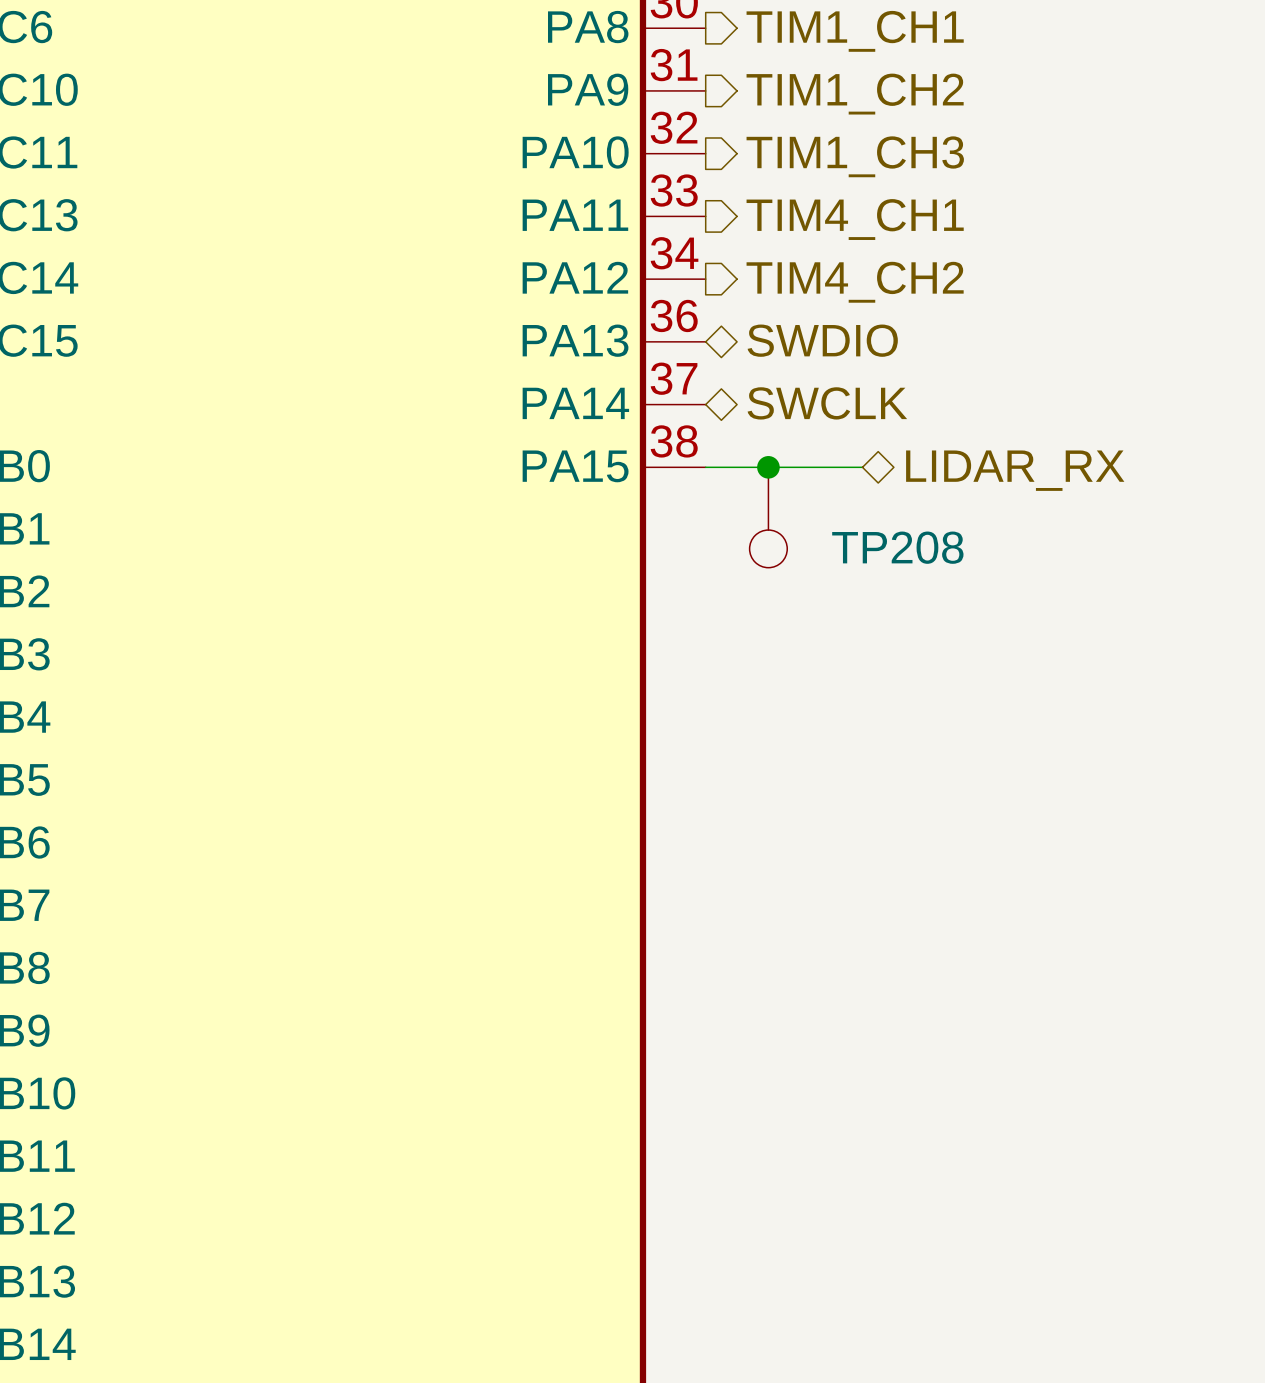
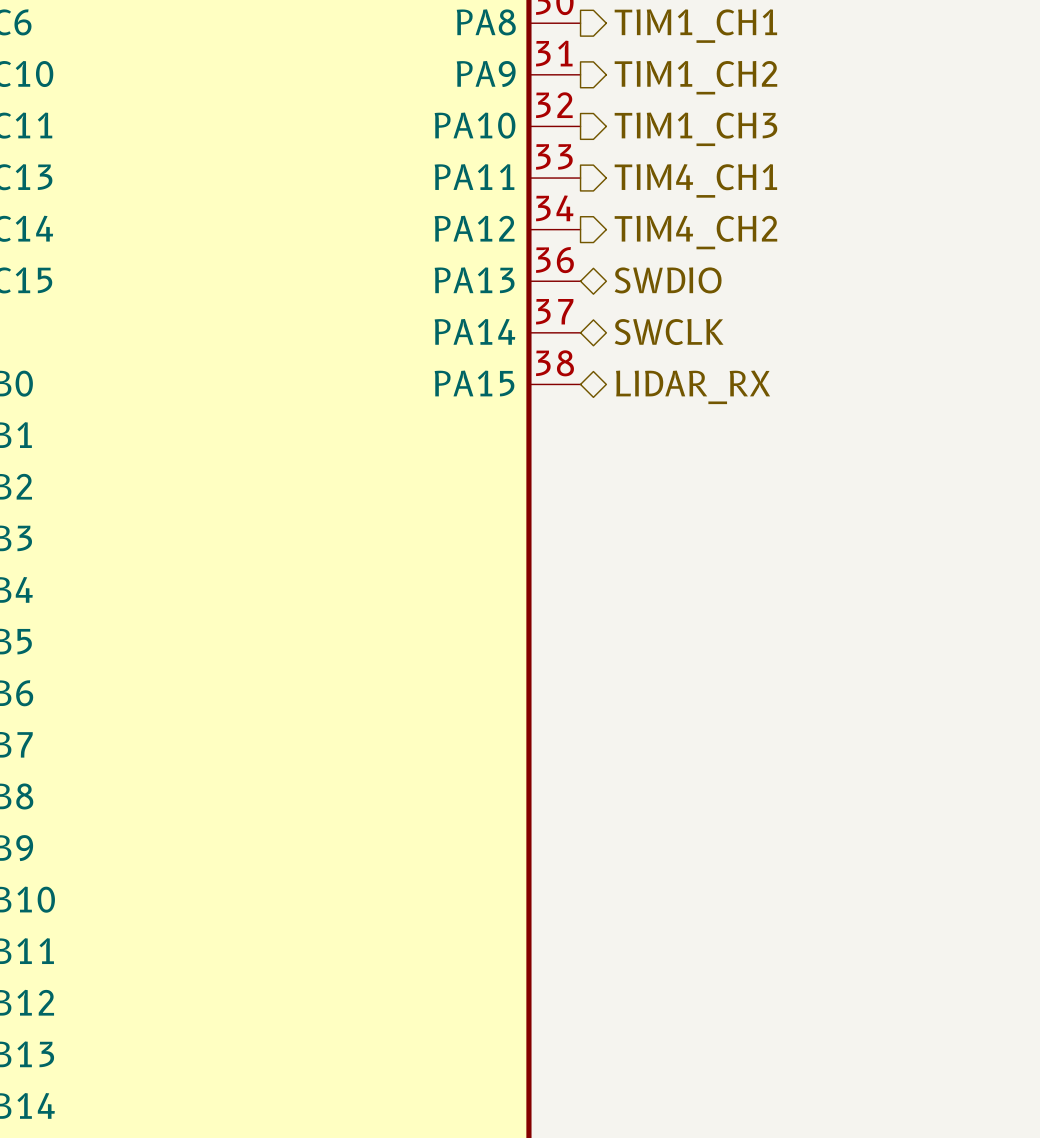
wire: (705, 467) (862, 467) -> none
junction: (768, 467) -> none
hierarchical label position: LIDAR_RX (1015, 470) -> LIDAR_RX (693, 387)
TP208: (768, 517) -> none

